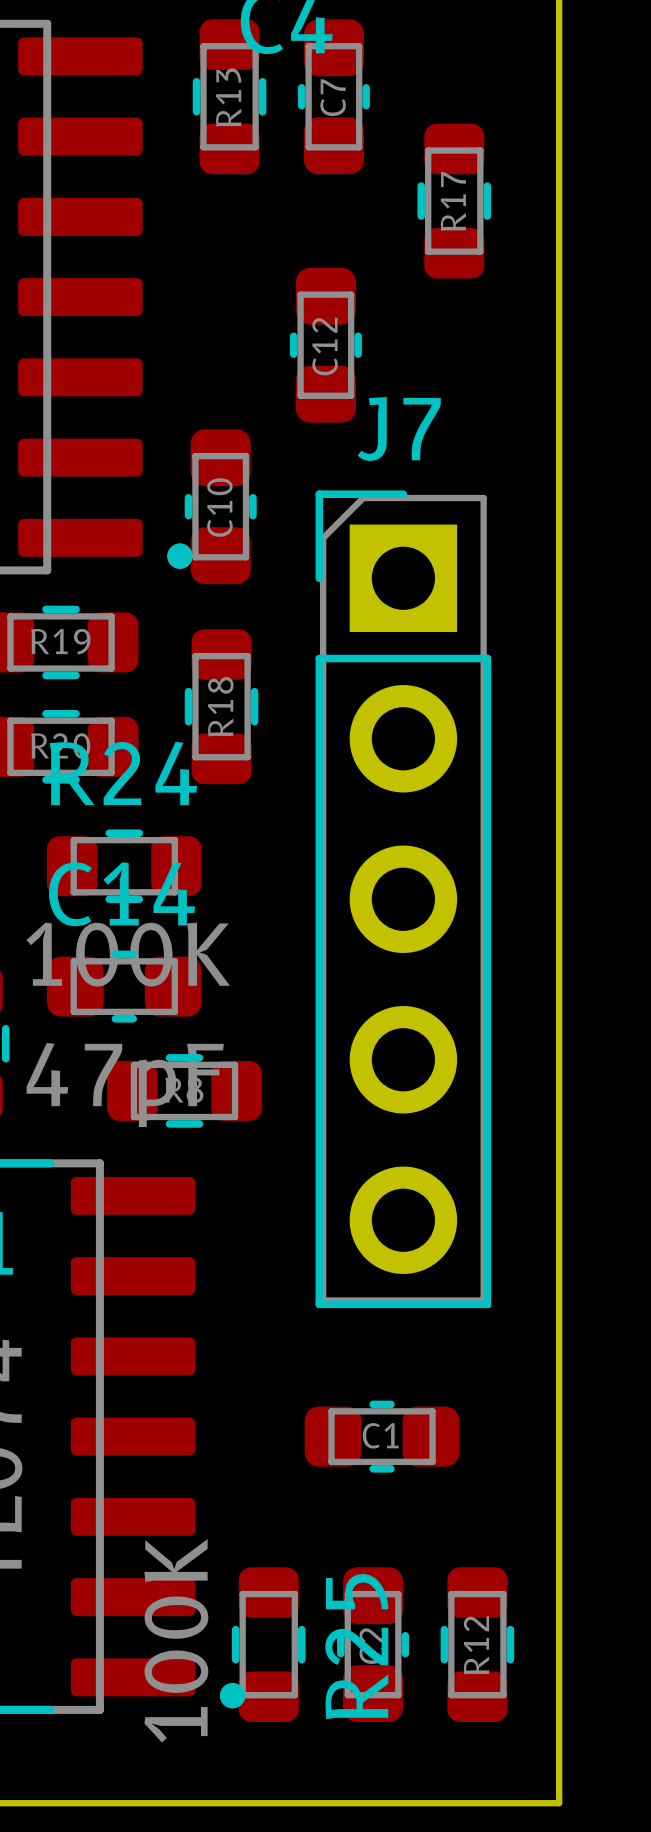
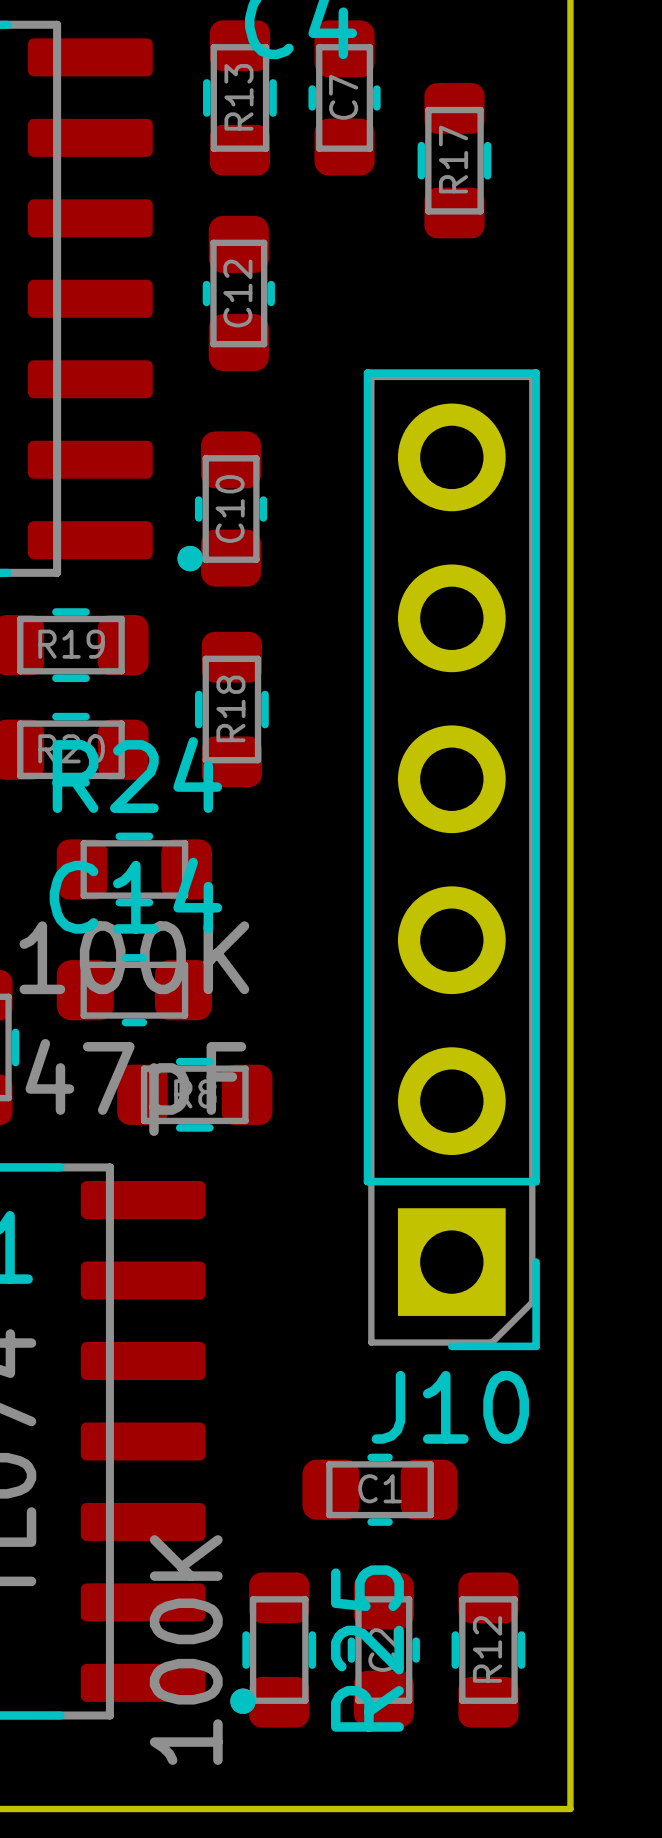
R17 position: (454, 201) -> (454, 160)
C12 position: (325, 345) -> (238, 293)
J10: none -> (451, 859)
J7: (403, 899) -> none
C1 position: (382, 1436) -> (380, 1489)

